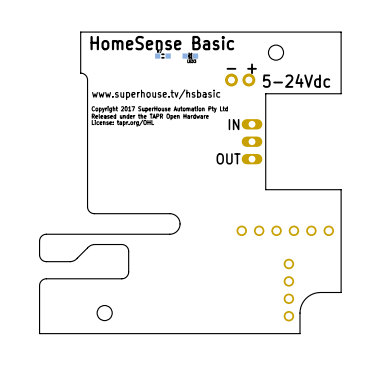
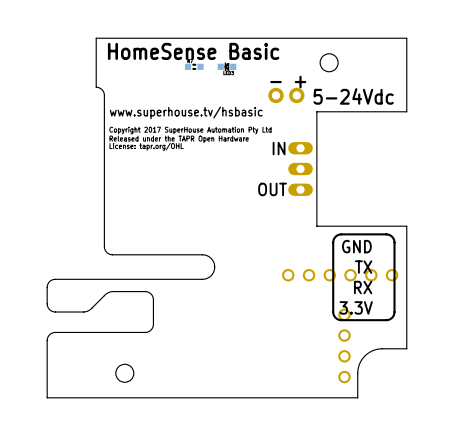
line: none -> (386, 234) (340, 234) (334, 238) (333, 312) (337, 319) (386, 320) (393, 316) (394, 241) (391, 236) (386, 234)
text: none -> GND (356, 246)
text: none -> TX (363, 267)
text: none -> RX (363, 287)
text: none -> 3.3V (356, 307)

